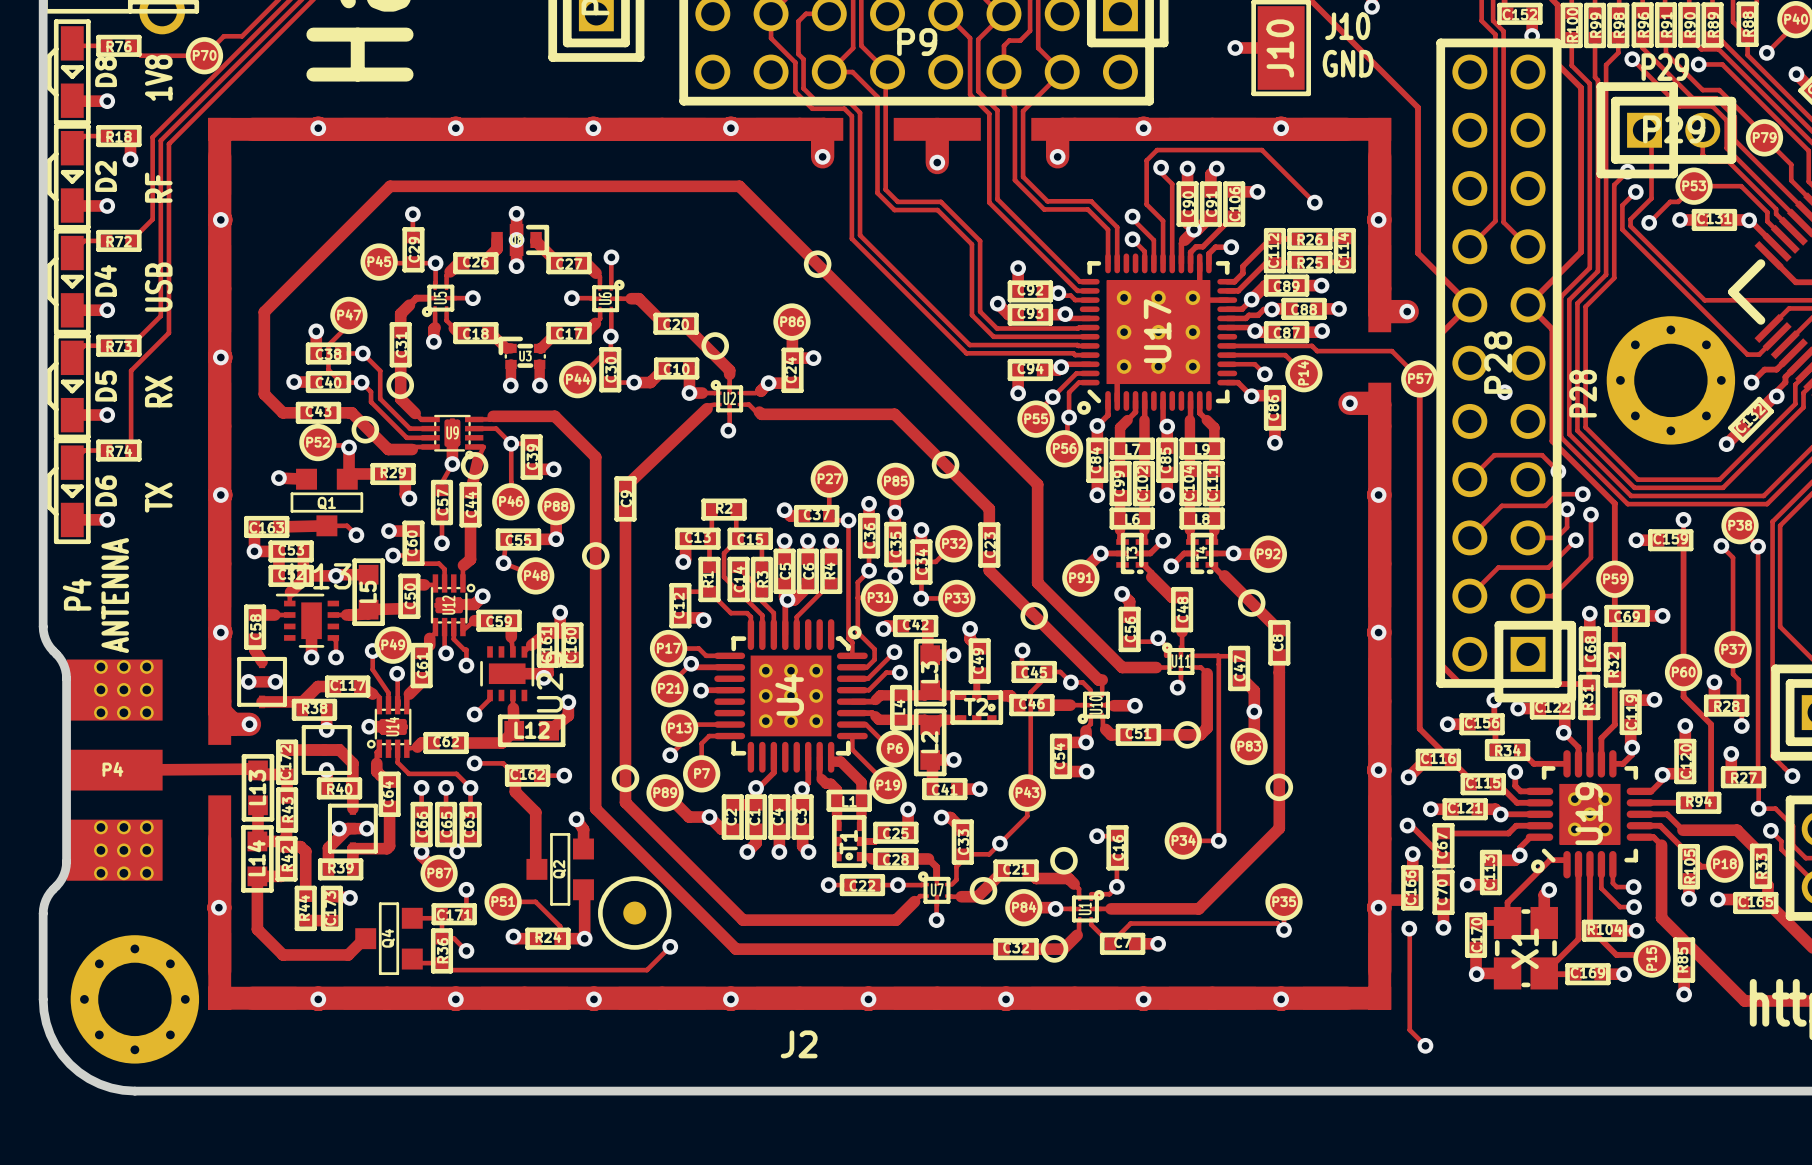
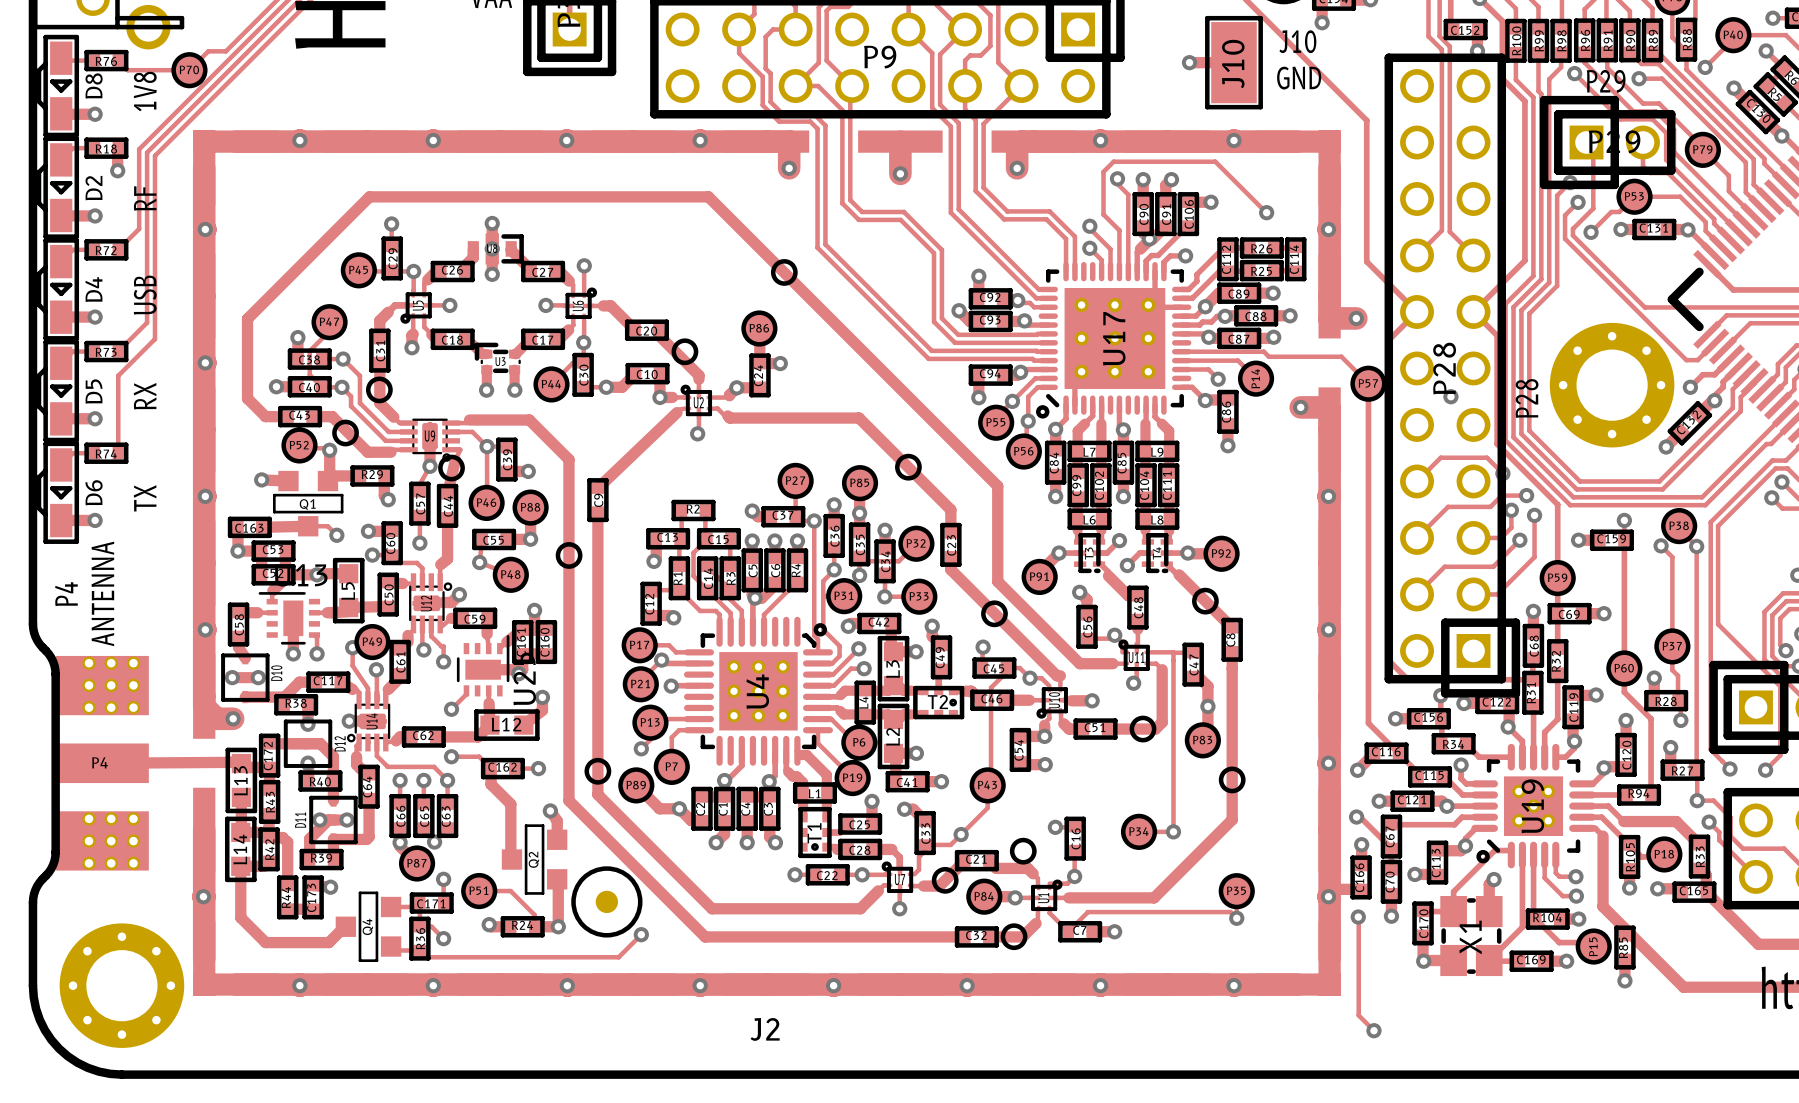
D10 name: none -> D10 (276, 673)
D12 name: none -> D12 (340, 743)
D11 name: none -> D11 (300, 820)

